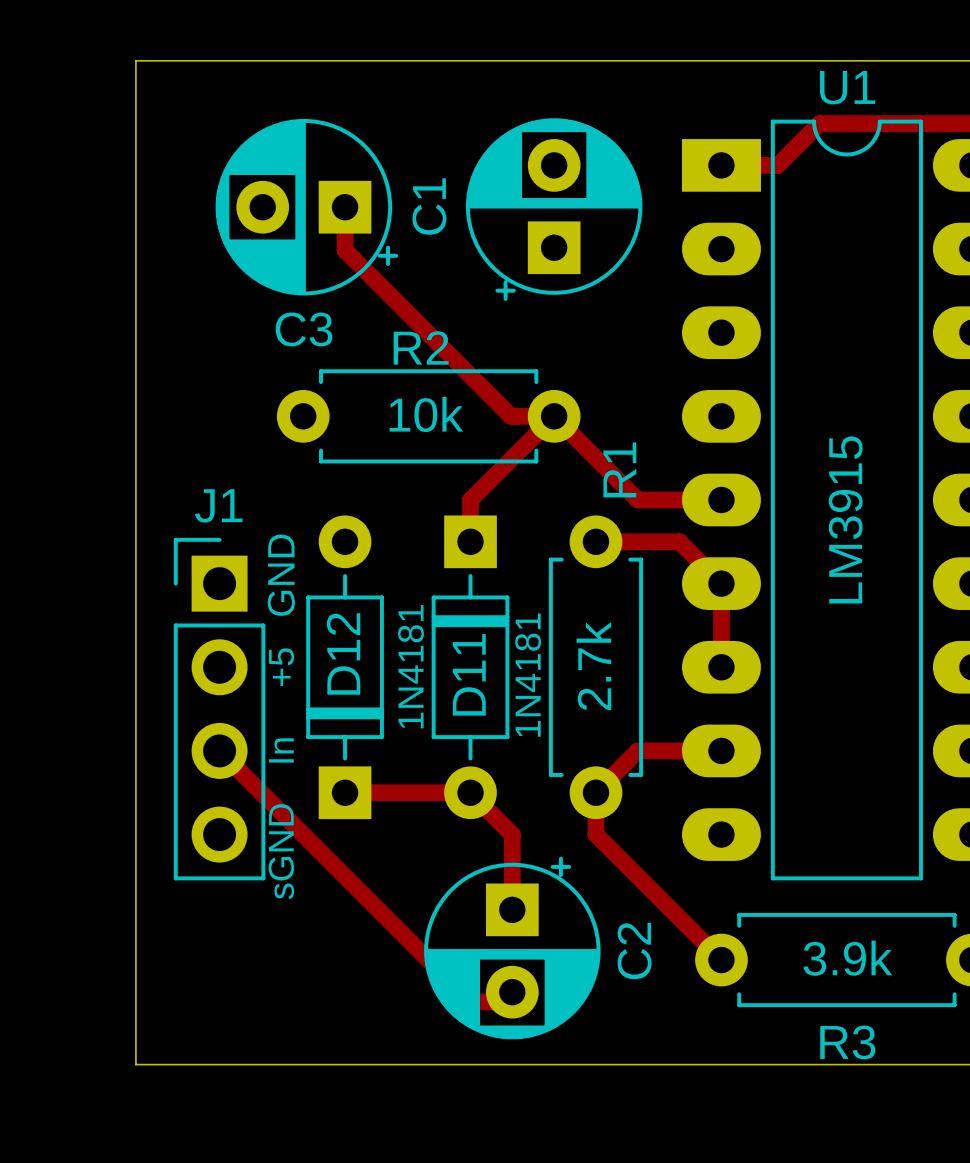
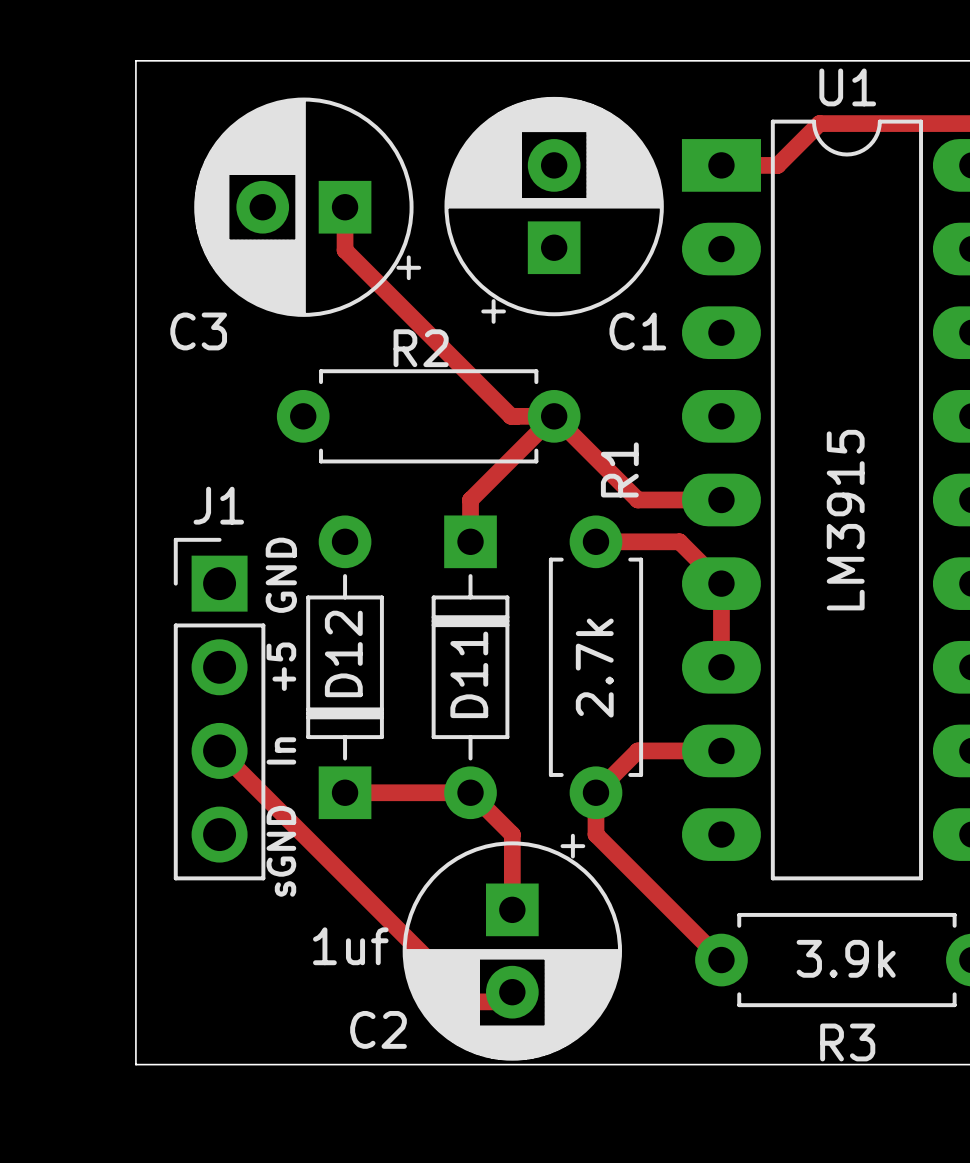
C3 footprint: [215, 118, 399, 296] -> [194, 97, 422, 317]
C1 footprint: [465, 118, 643, 301] -> [444, 96, 664, 324]
C1 name rotation: 0° (429, 206) -> 90° clockwise (637, 331)
C1 name position: C1 (429, 206) -> C1 (637, 331)
C3 name position: C3 (304, 329) -> C3 (198, 331)
R2 value: 10k (426, 414) -> none
D12 value: 1N4181 (411, 666) -> none
D11 value: 1N4181 (528, 675) -> none
C2 footprint: [424, 856, 601, 1040] -> [402, 833, 623, 1061]
C2 value: none -> 1uf (350, 946)
C2 name rotation: 0° (634, 951) -> 90° clockwise (378, 1029)
C2 name position: C2 (634, 951) -> C2 (378, 1029)

